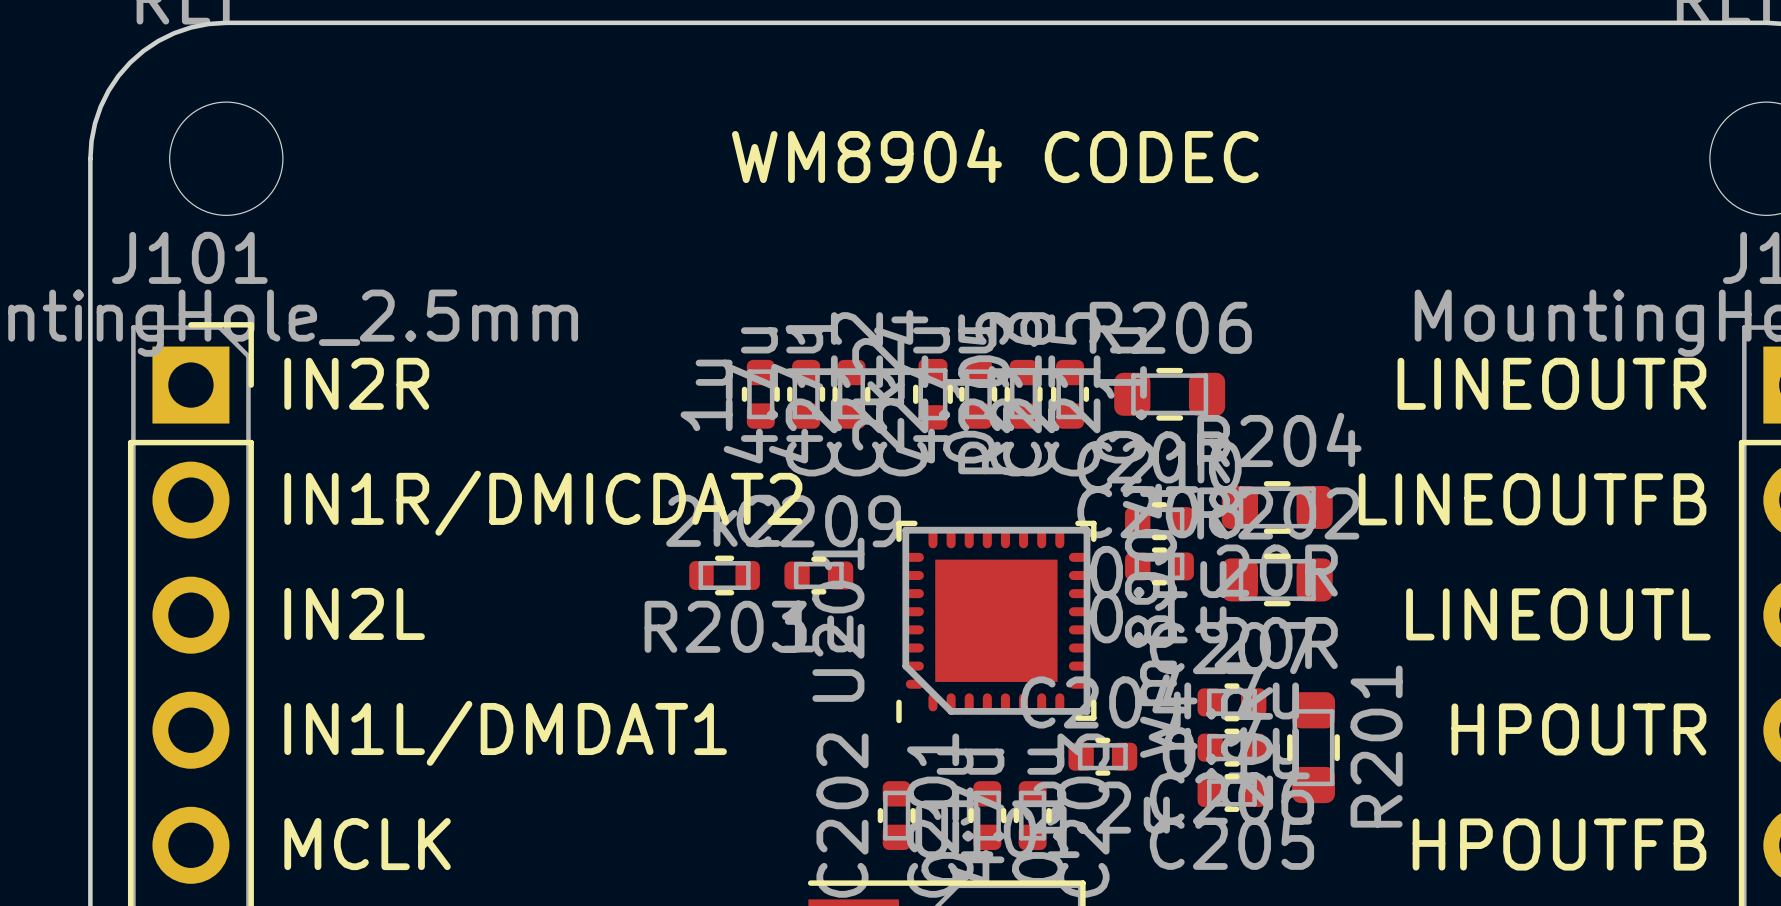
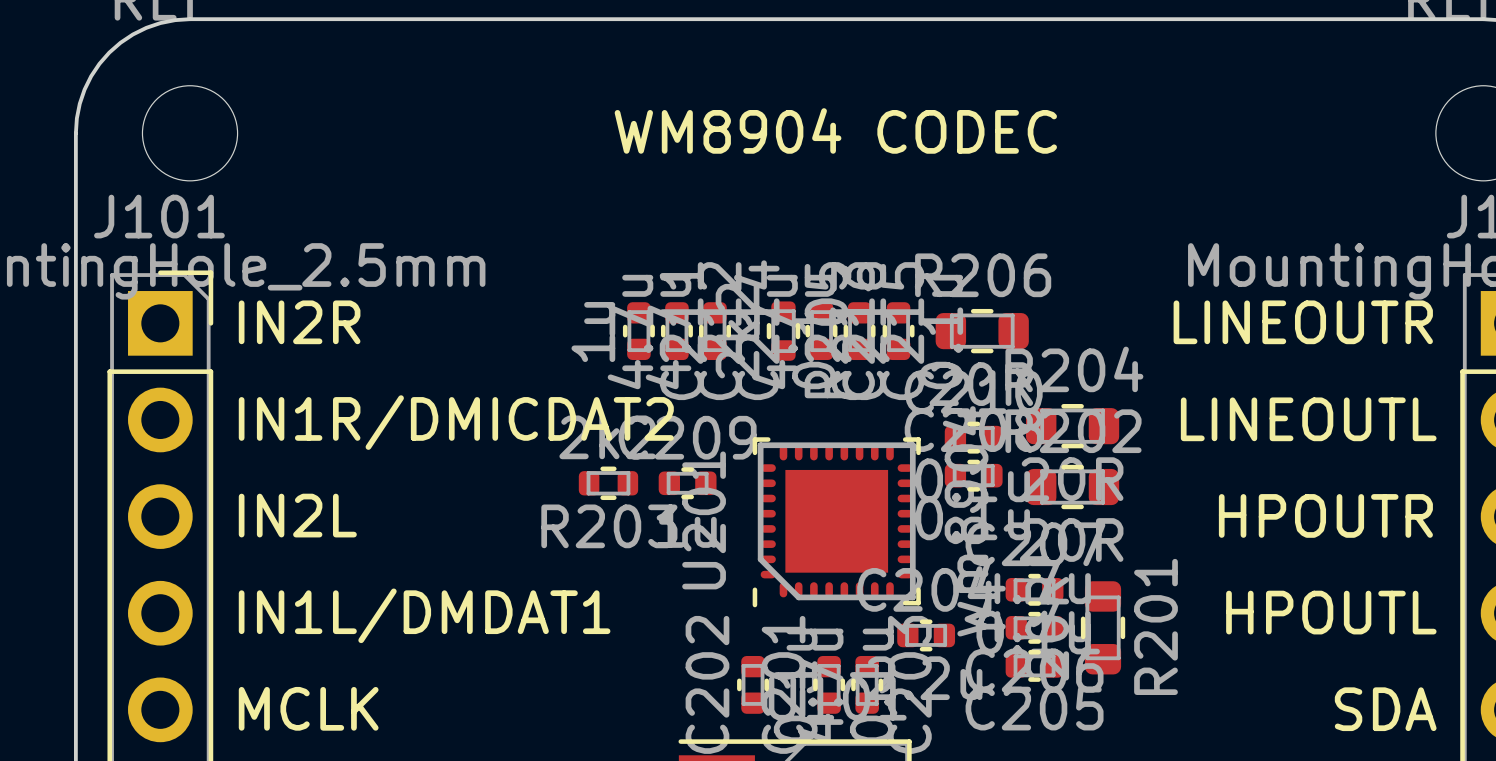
text: LINEOUTFB (1532, 499) -> LINEOUTL (1308, 419)
text: LINEOUTL (1558, 614) -> HPOUTR (1325, 515)
text: HPOUTR (1578, 729) -> HPOUTL (1331, 612)
text: HPOUTFB (1559, 844) -> SDA (1385, 709)

